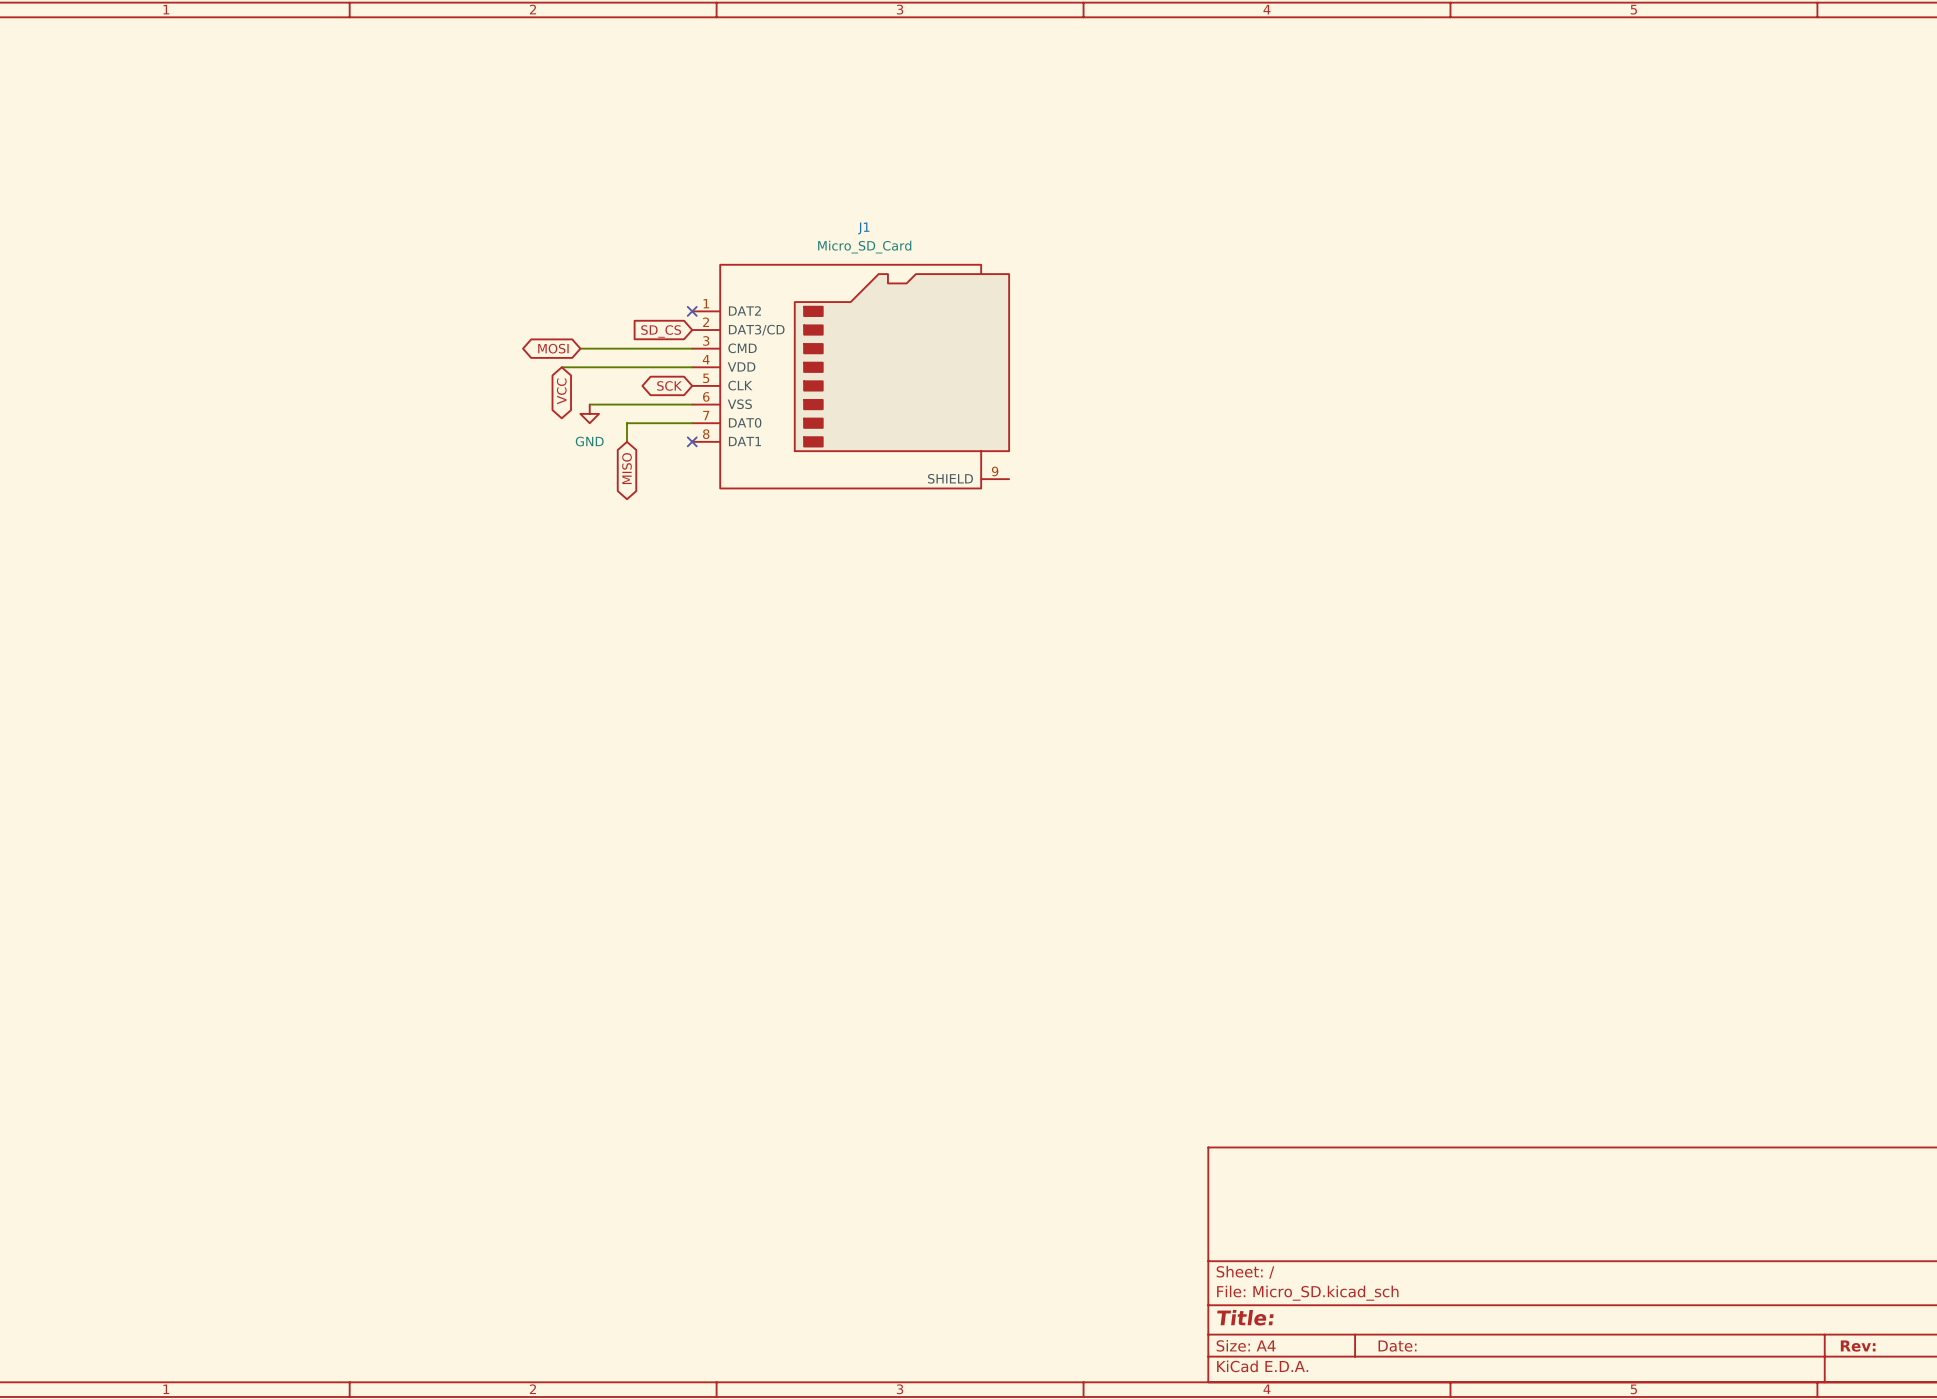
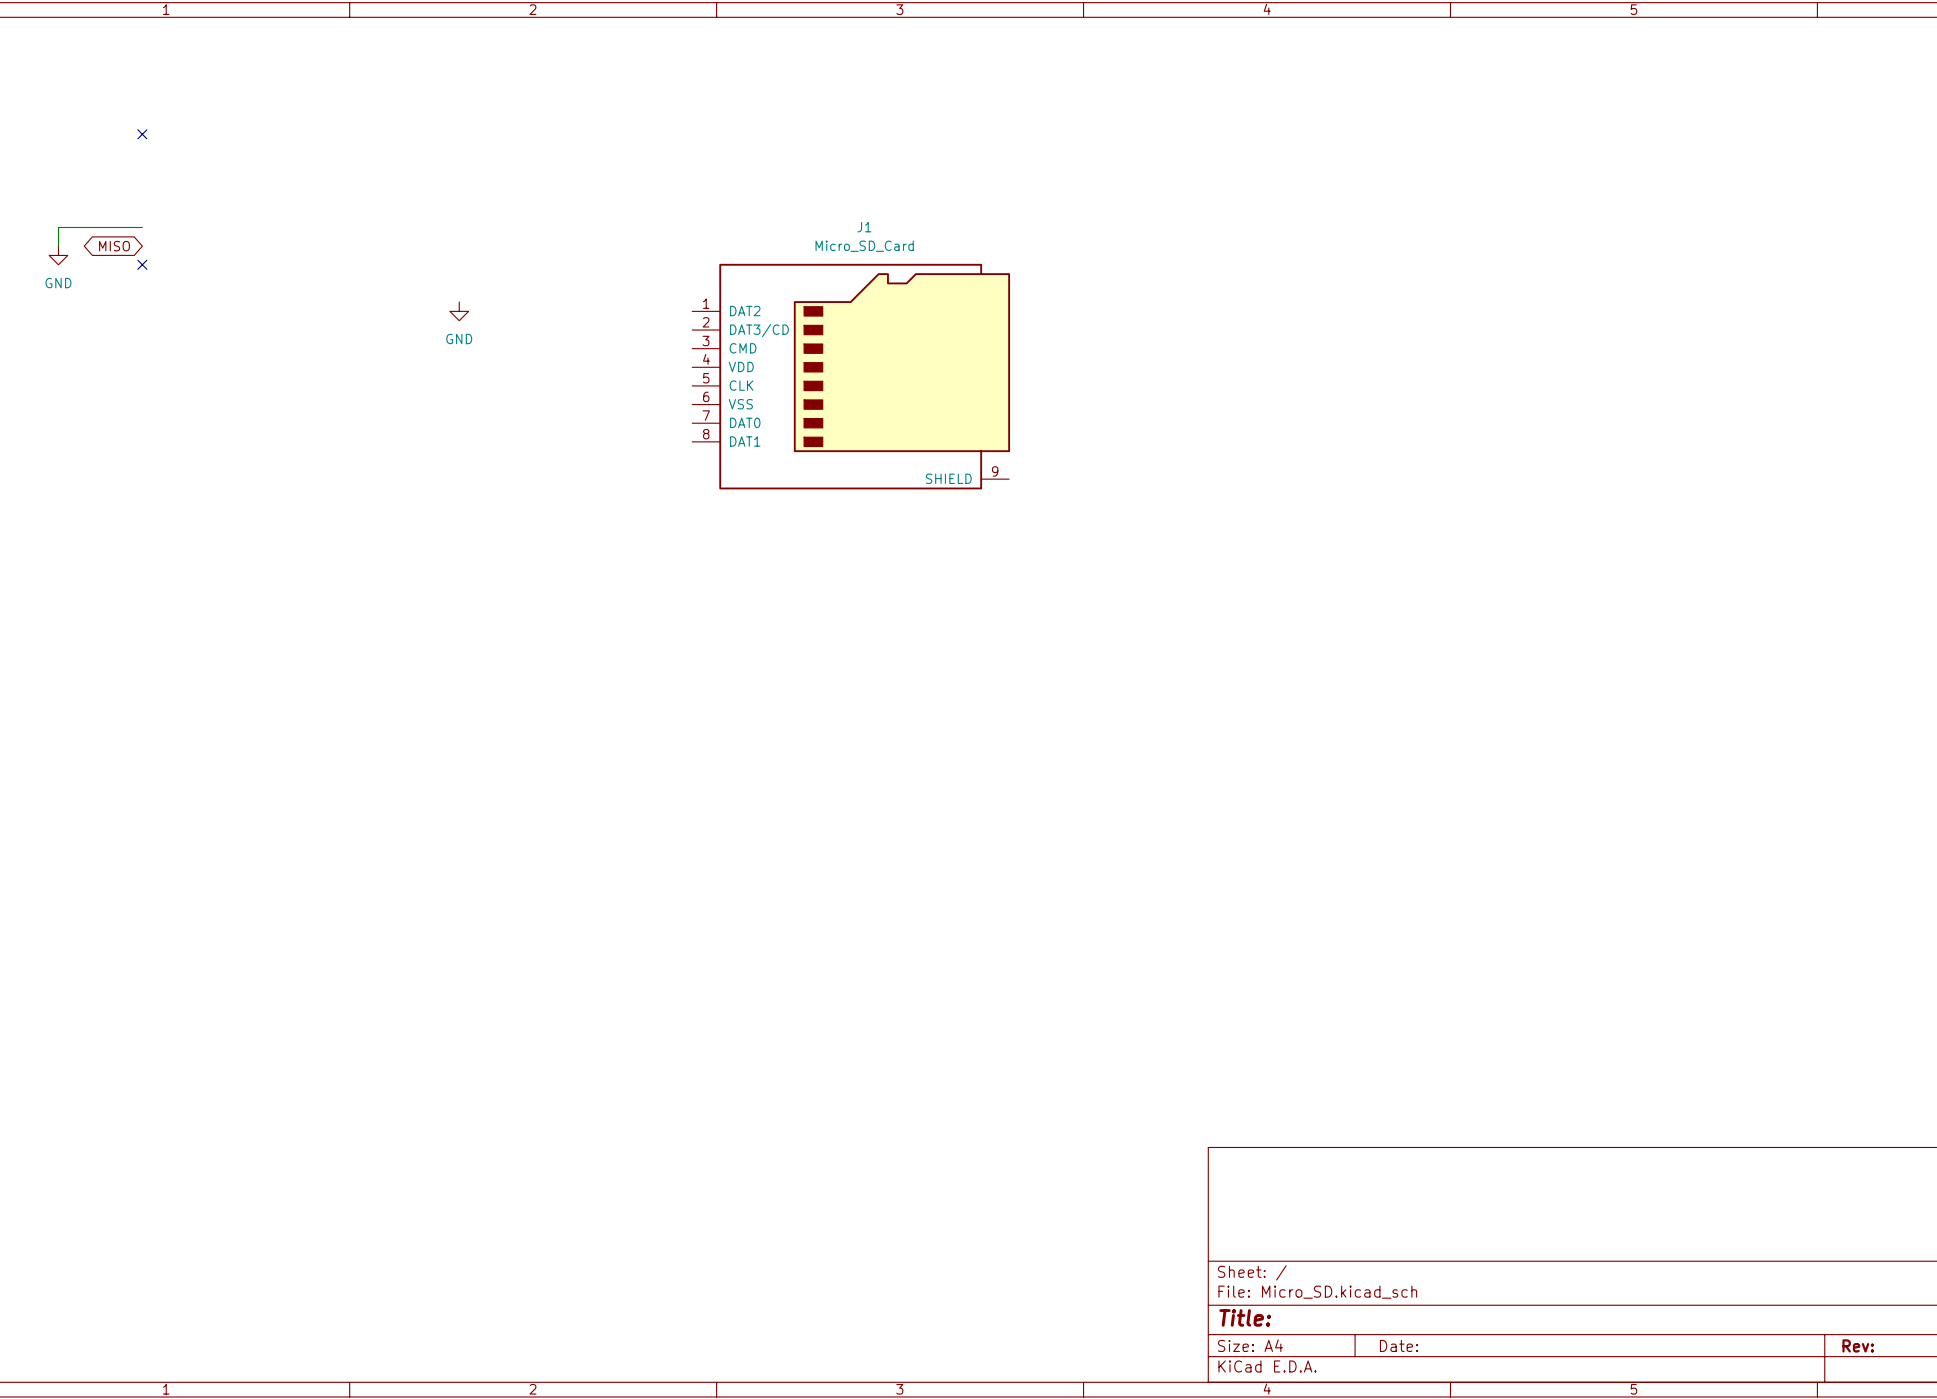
no-connect mark: none -> (142, 134)
wire: none -> (142, 227) (58, 227) (58, 246)
global label: none -> MISO (114, 246)
power symbol: none -> GND (58, 255)
no-connect mark: none -> (142, 264)
no-connect mark: (692, 311) -> none
global label: SD_CS (661, 331) -> none
global label: MOSI (553, 348) -> none
wire: (580, 348) (692, 348) -> none
wire: (561, 367) (692, 367) -> none
global label: SCK (669, 385) -> none
global label: VCC (561, 391) -> none
wire: (589, 404) (692, 404) -> none
power symbol position: GND (589, 413) -> GND (459, 311)
wire: (692, 423) (627, 423) (627, 441) -> none
no-connect mark: (692, 441) -> none
global label: MISO (627, 468) -> none

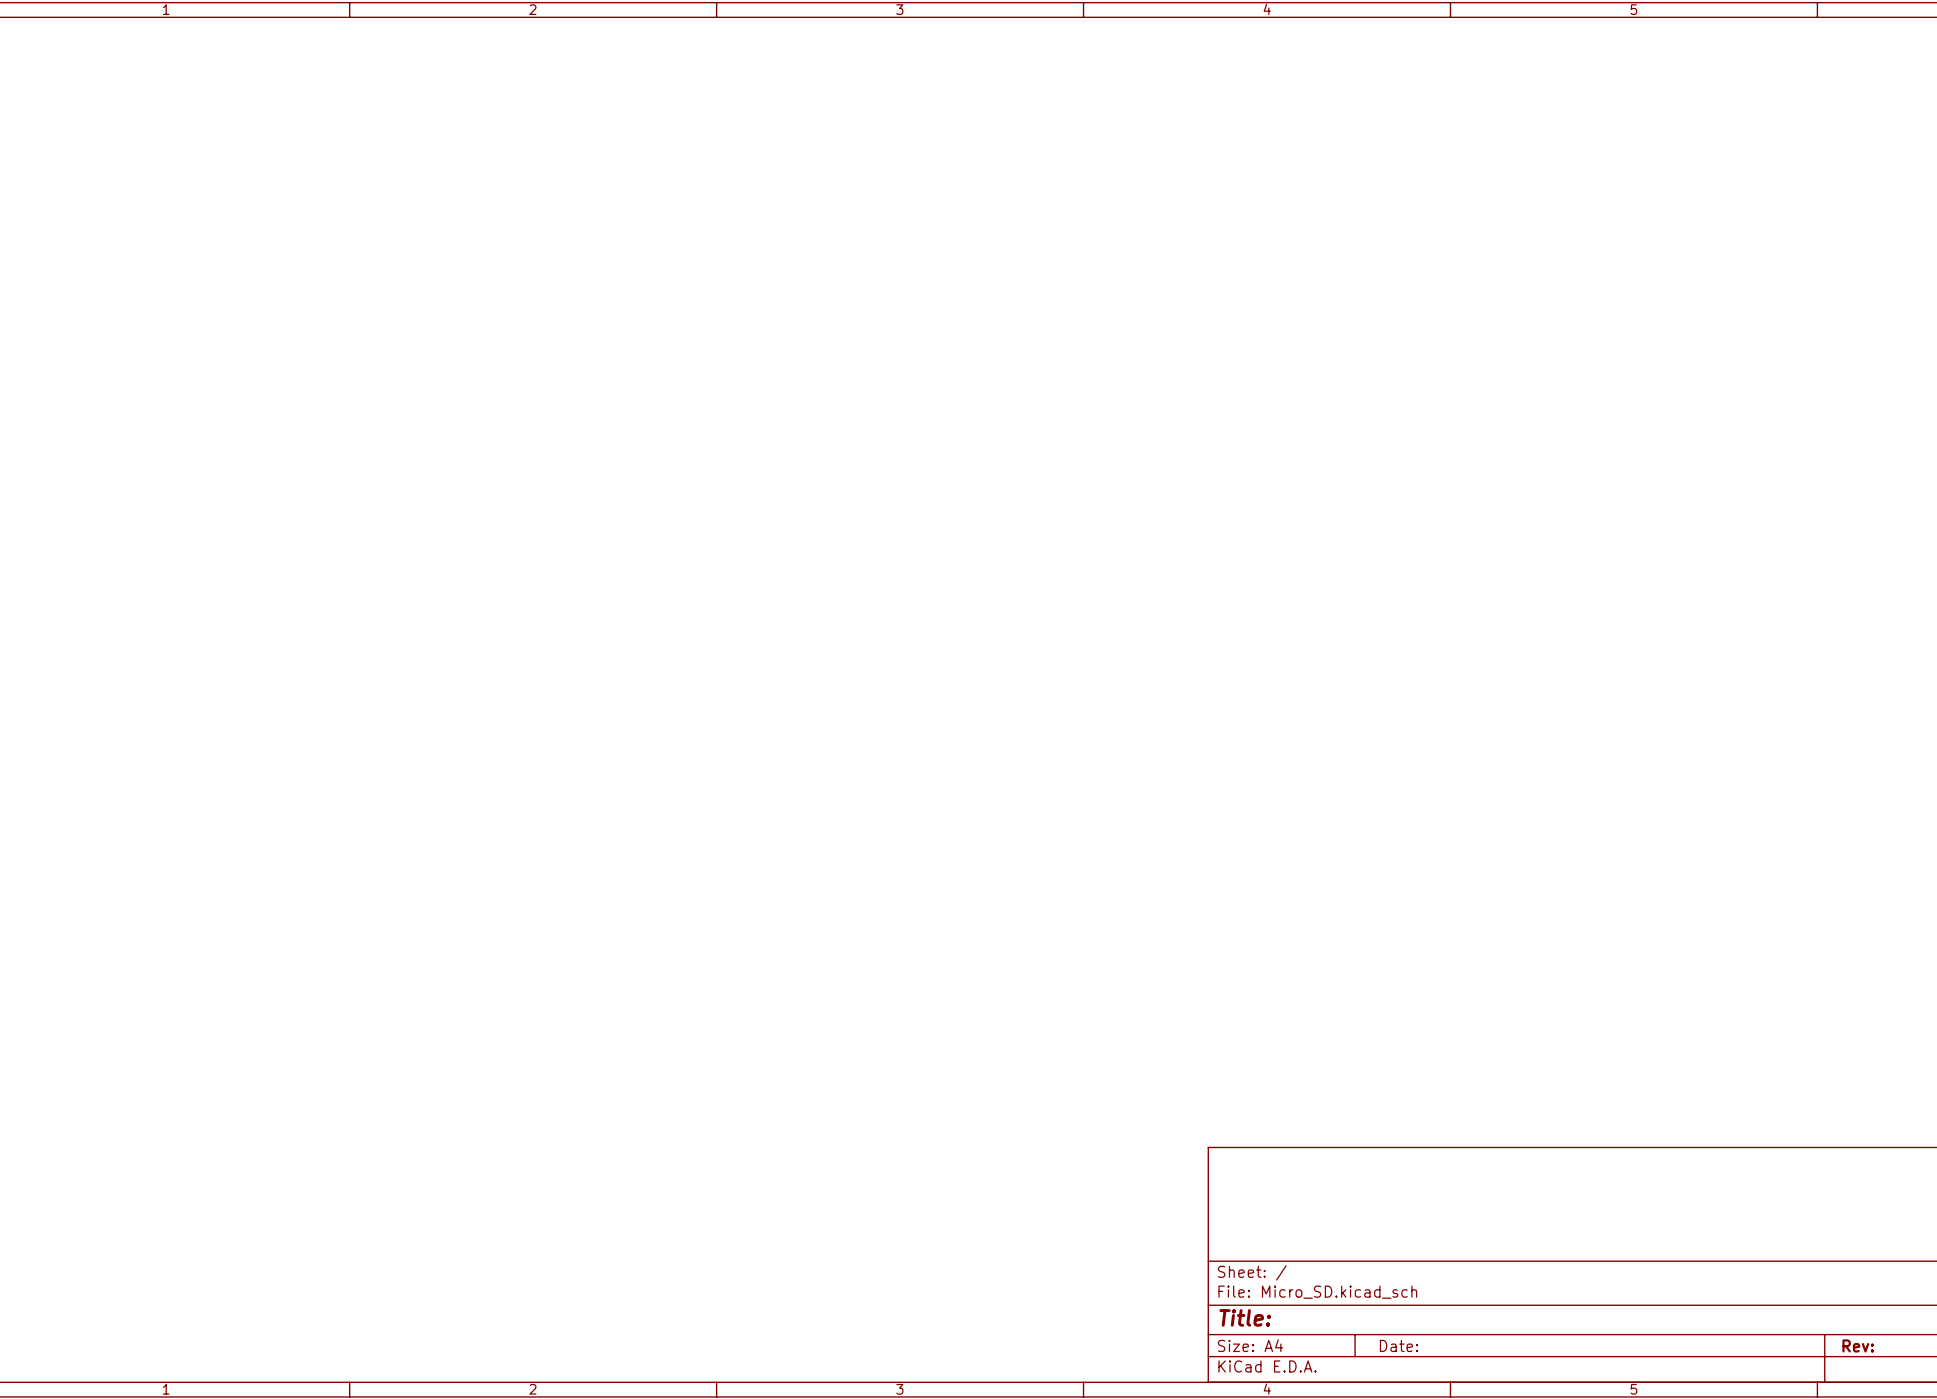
no-connect mark: (142, 134) -> none
wire: (142, 227) (58, 227) (58, 246) -> none
global label: MISO (114, 246) -> none
power symbol: GND (58, 255) -> none
no-connect mark: (142, 264) -> none
power symbol: GND (459, 311) -> none
J1: Micro_SD_Card (851, 376) -> none

